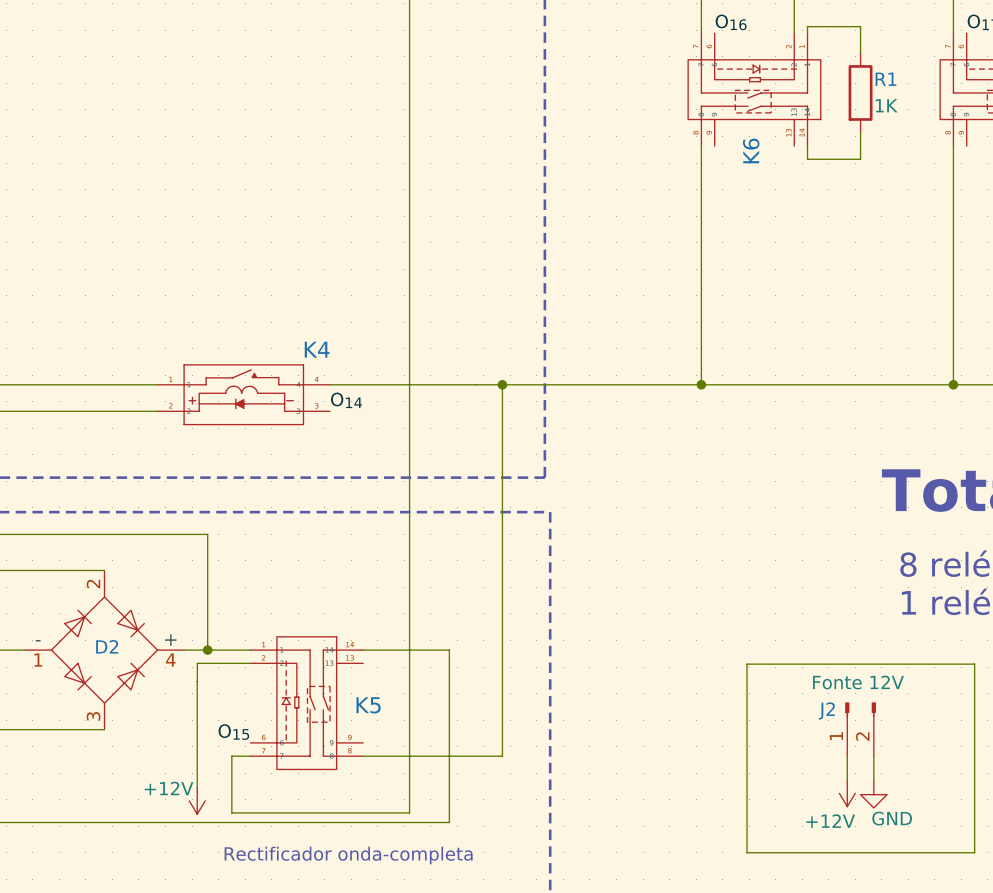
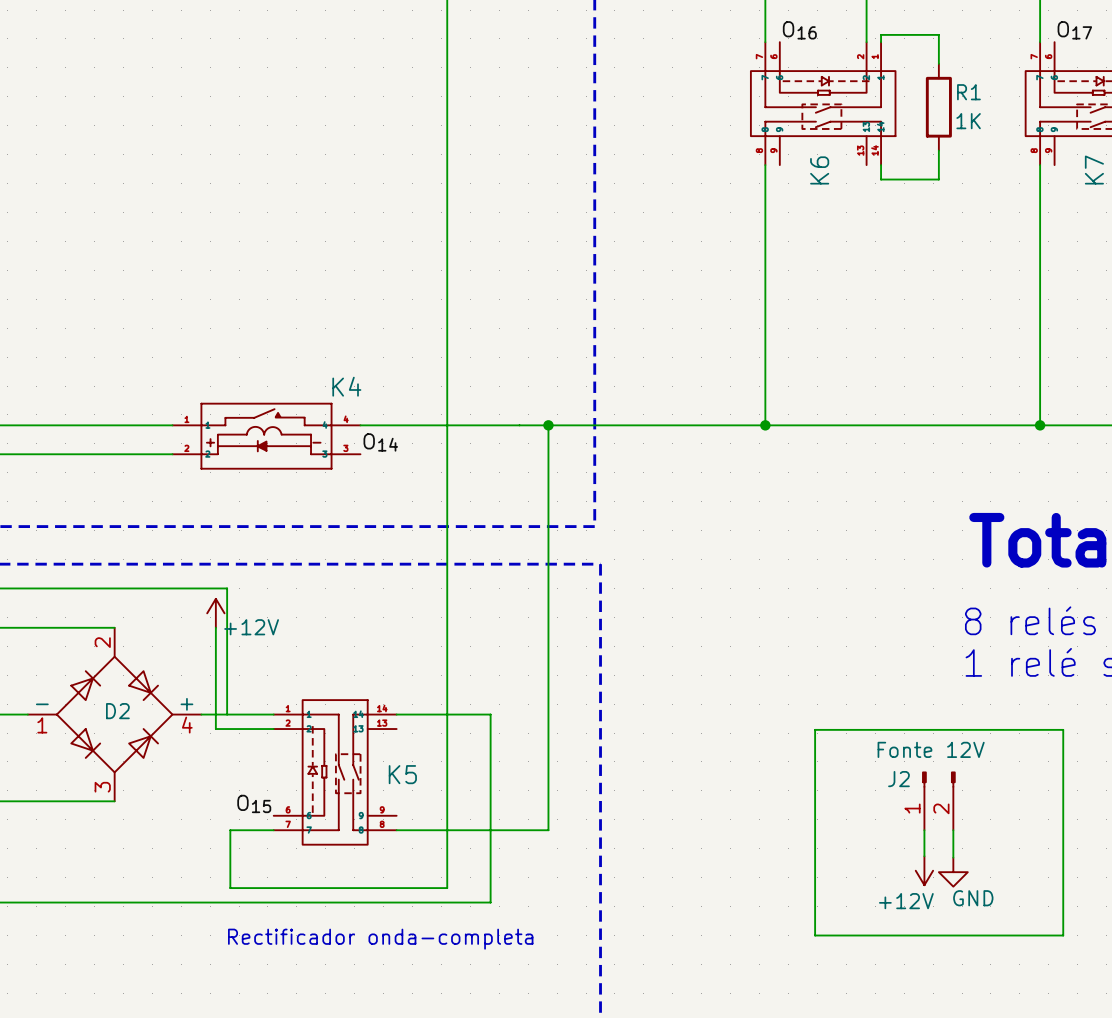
junction: (207, 650) -> none
wire: (197, 663) (197, 681) -> (215, 729) (215, 627)
wire: (197, 681) (197, 787) -> none
wire: (231, 756) (231, 812) (409, 812) (409, 809) -> (253, 830) (230, 830) (230, 888) (447, 888)
power symbol rotation: 0° (197, 800) -> 180° (215, 613)
power symbol position: +12V (197, 800) -> +12V (215, 613)

